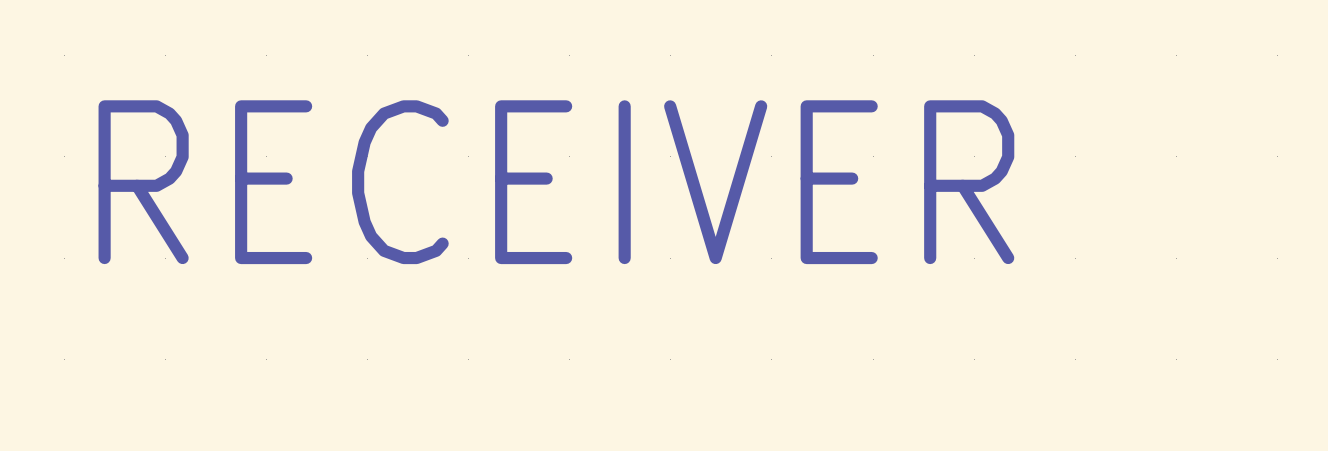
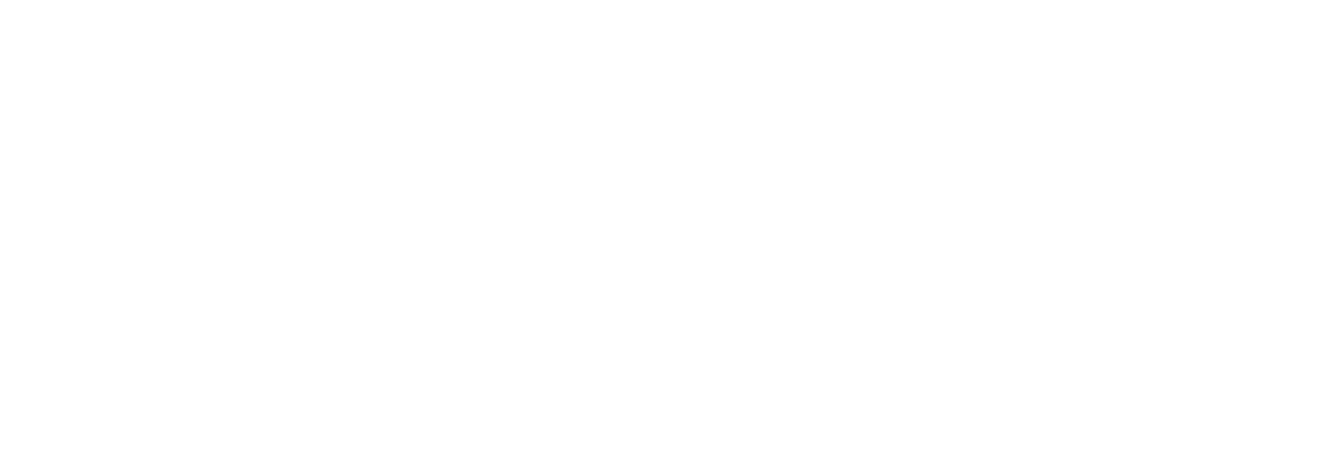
text: RECEIVER (556, 182) -> none

